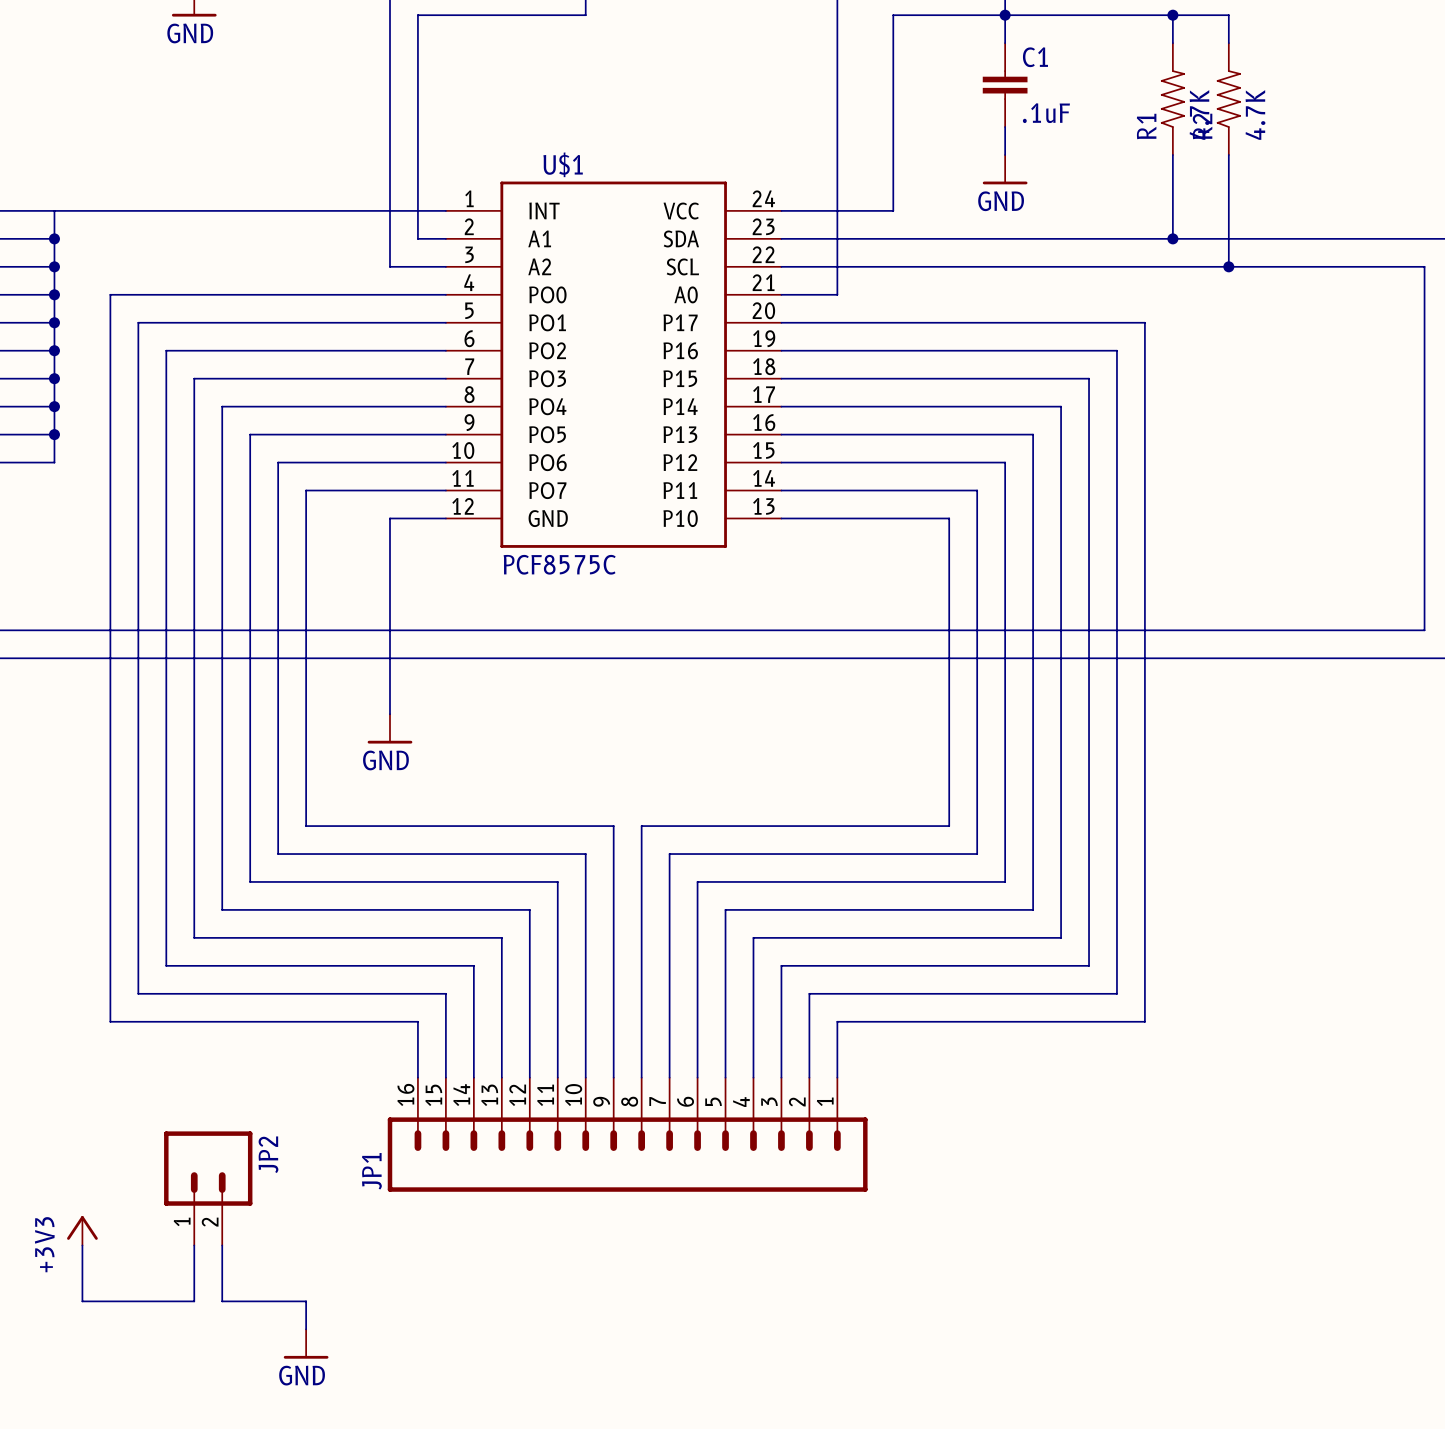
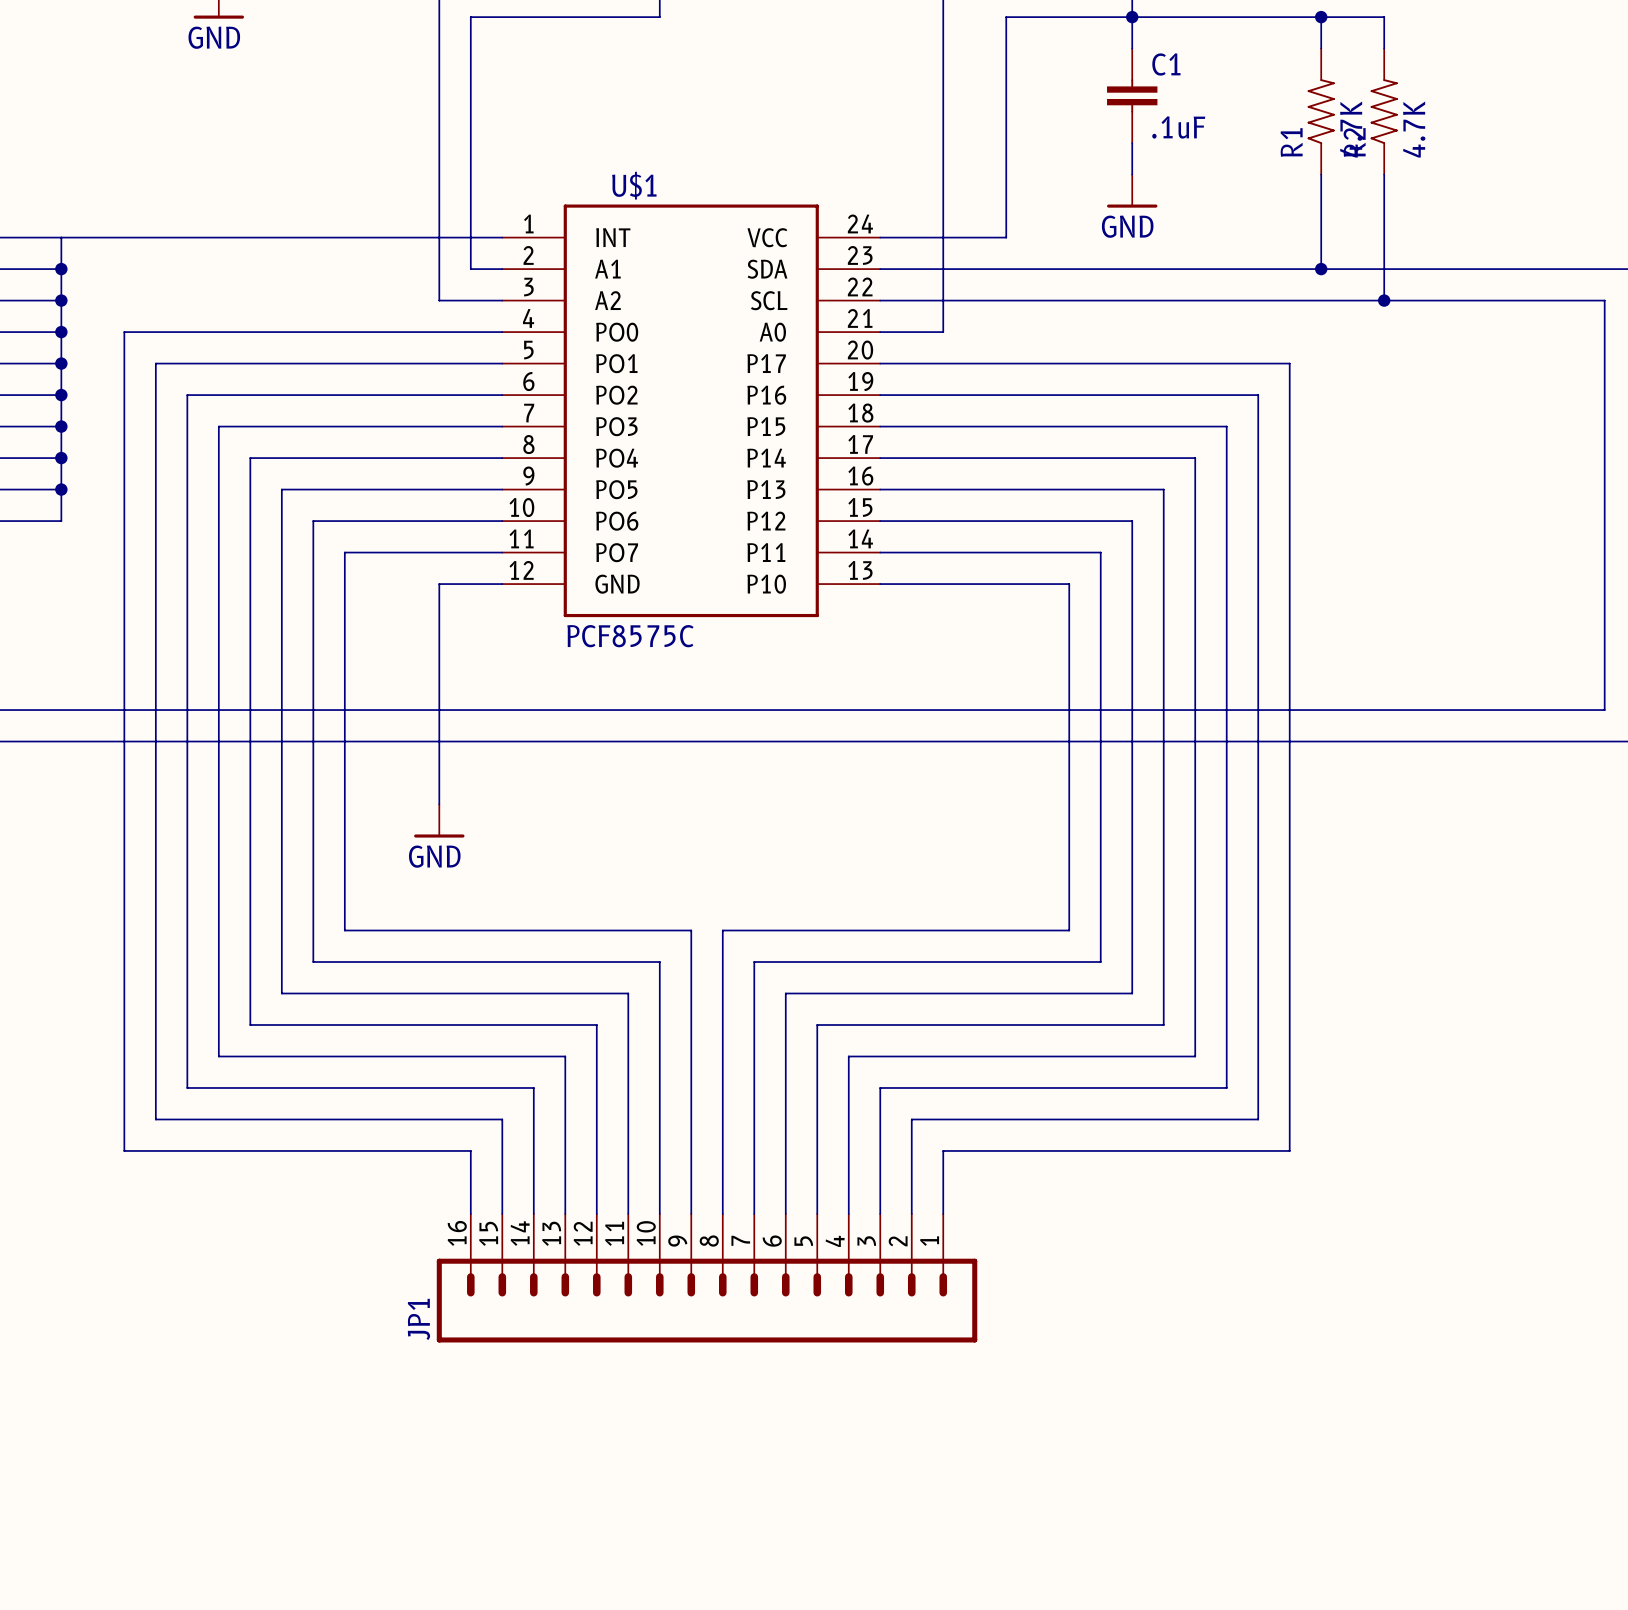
JP2: (208, 1188) -> none
power symbol: +3V3 (82, 1230) -> none
wire: (82, 1245) (82, 1301) (194, 1301) (194, 1245) -> none
wire: (222, 1245) (222, 1301) (306, 1301) (306, 1329) -> none
power symbol: GND (306, 1344) -> none

